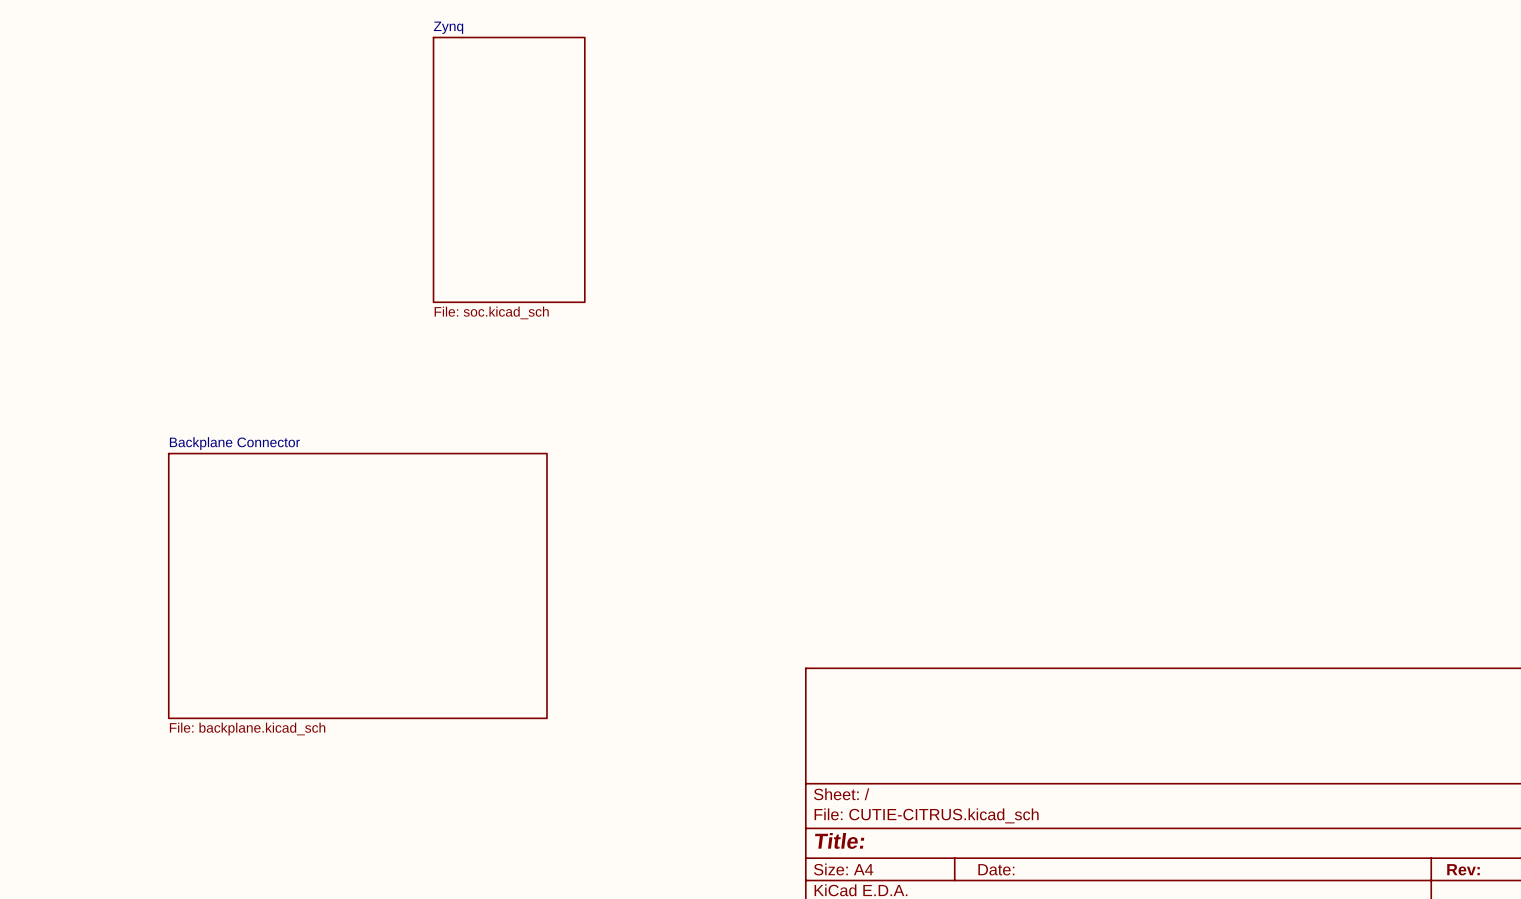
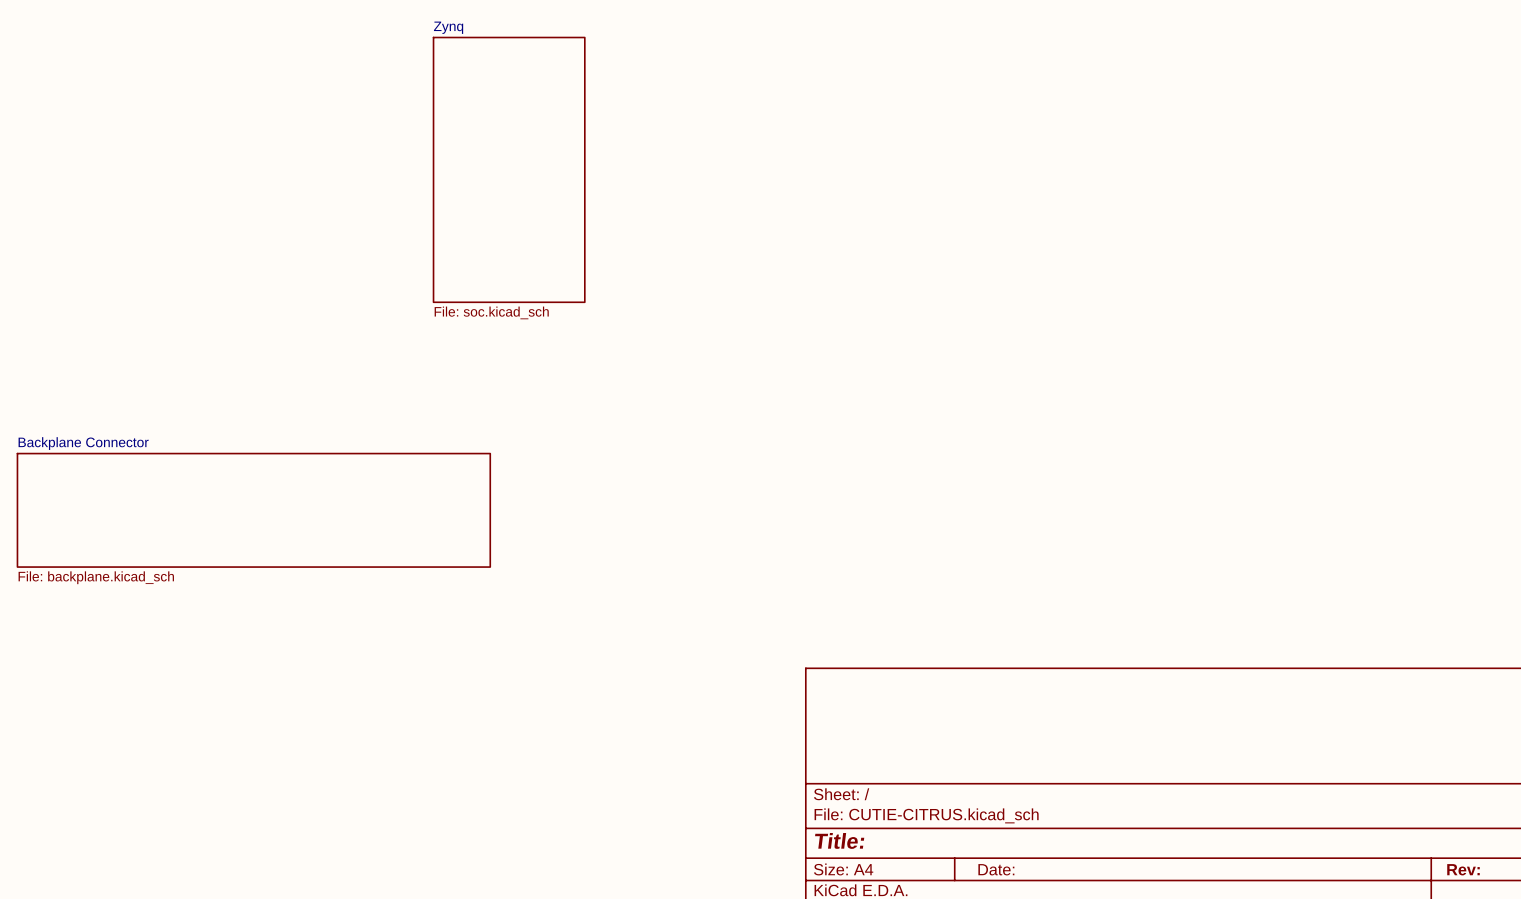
sheet Backplane Connector: none -> File: backplane.kicad_sch (253, 510)
sheet Backplane Connector: File: backplane.kicad_sch (357, 585) -> none

